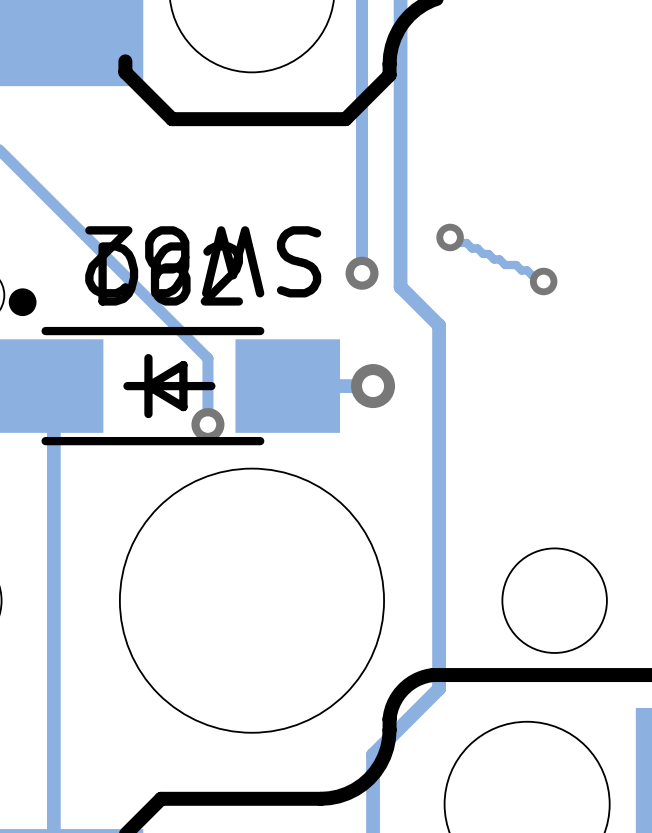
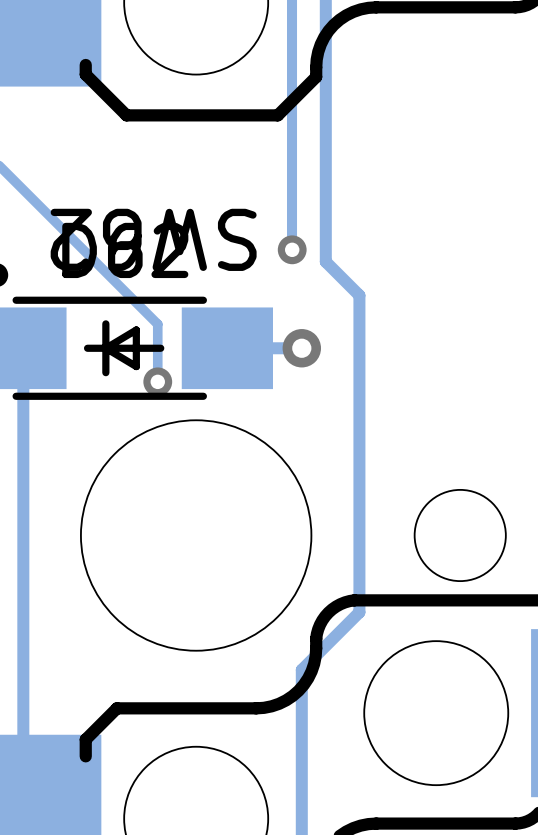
track: (450, 237) (455, 242) (466, 242) (472, 248) (477, 248) (483, 253) (488, 253) (494, 259) (499, 259) (505, 264) (516, 264) (521, 270) (527, 270) (532, 275) (538, 275) (543, 281) -> none
via: (450, 237) -> none
via: (543, 281) -> none

